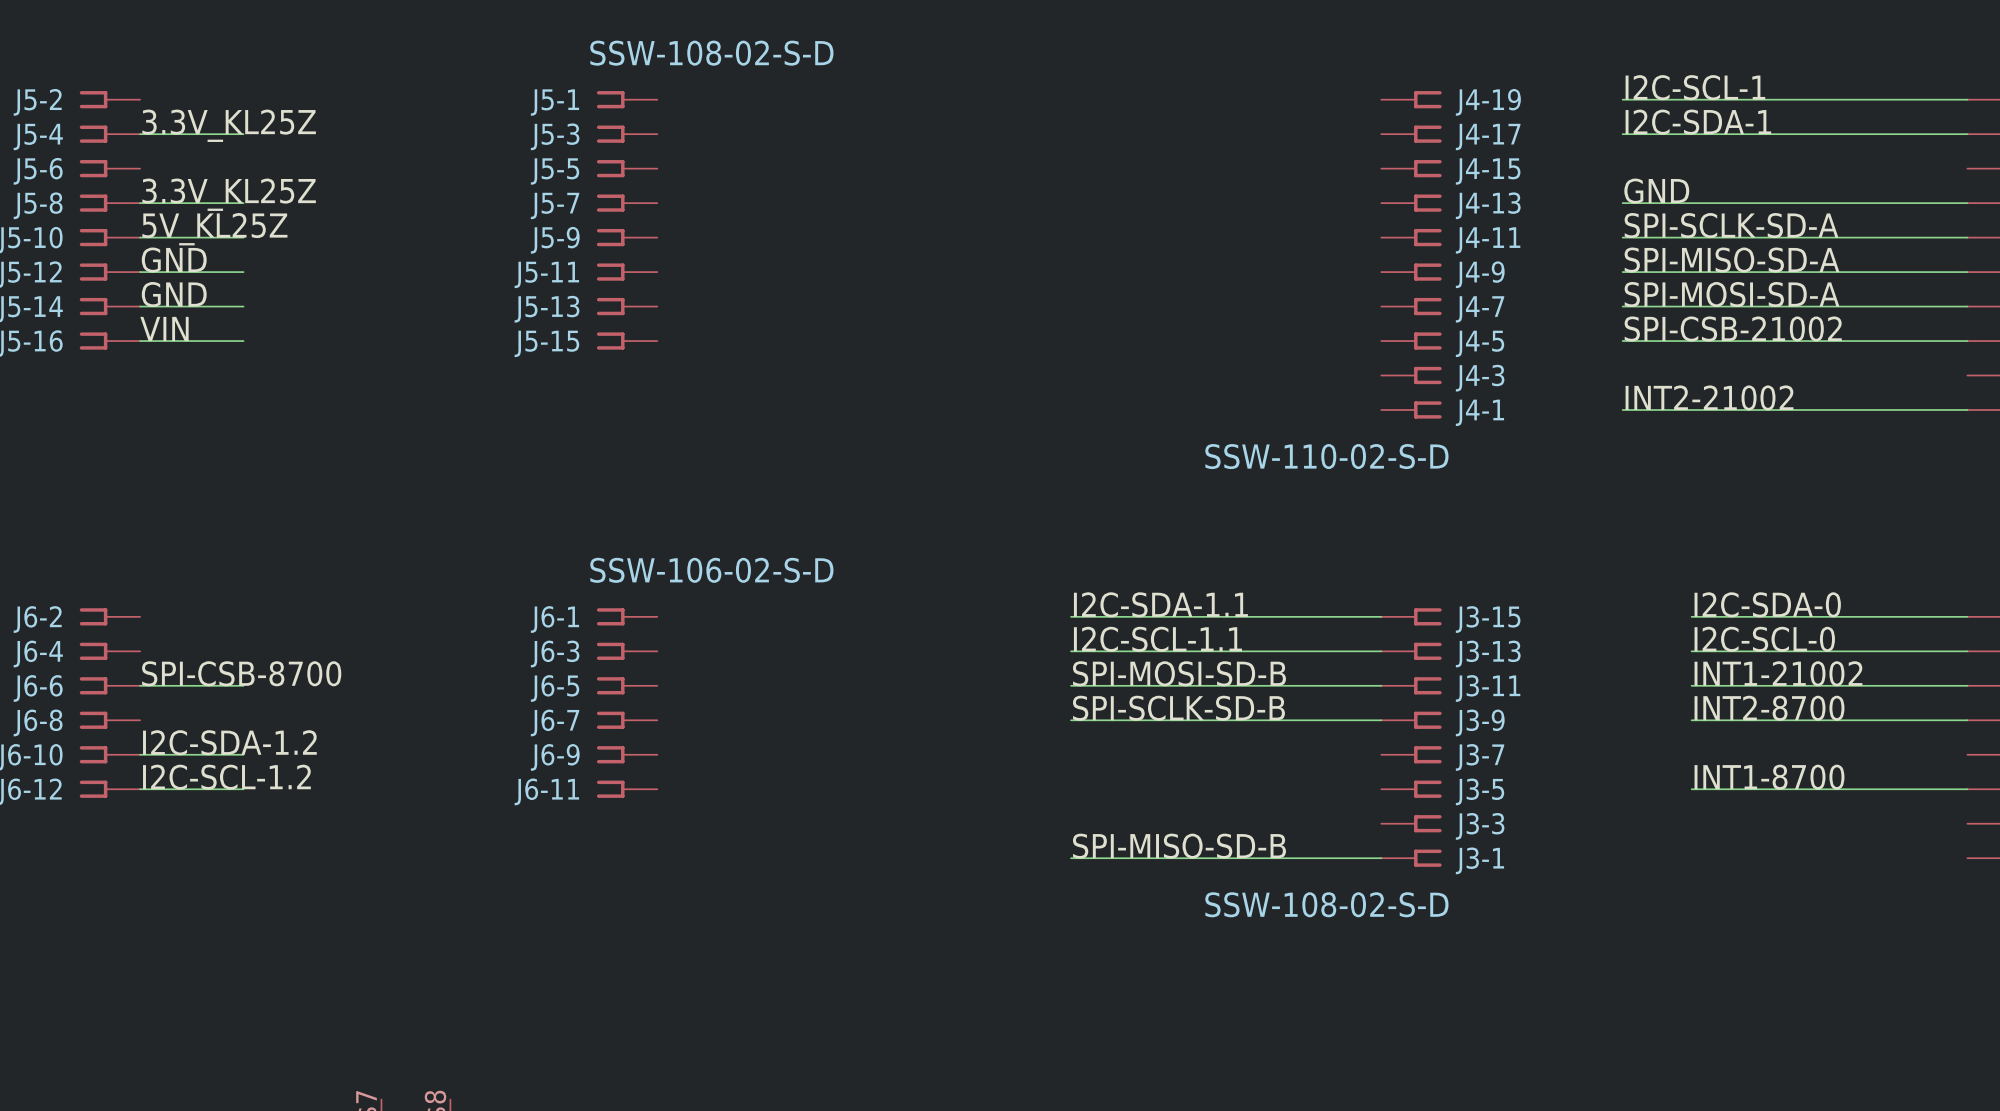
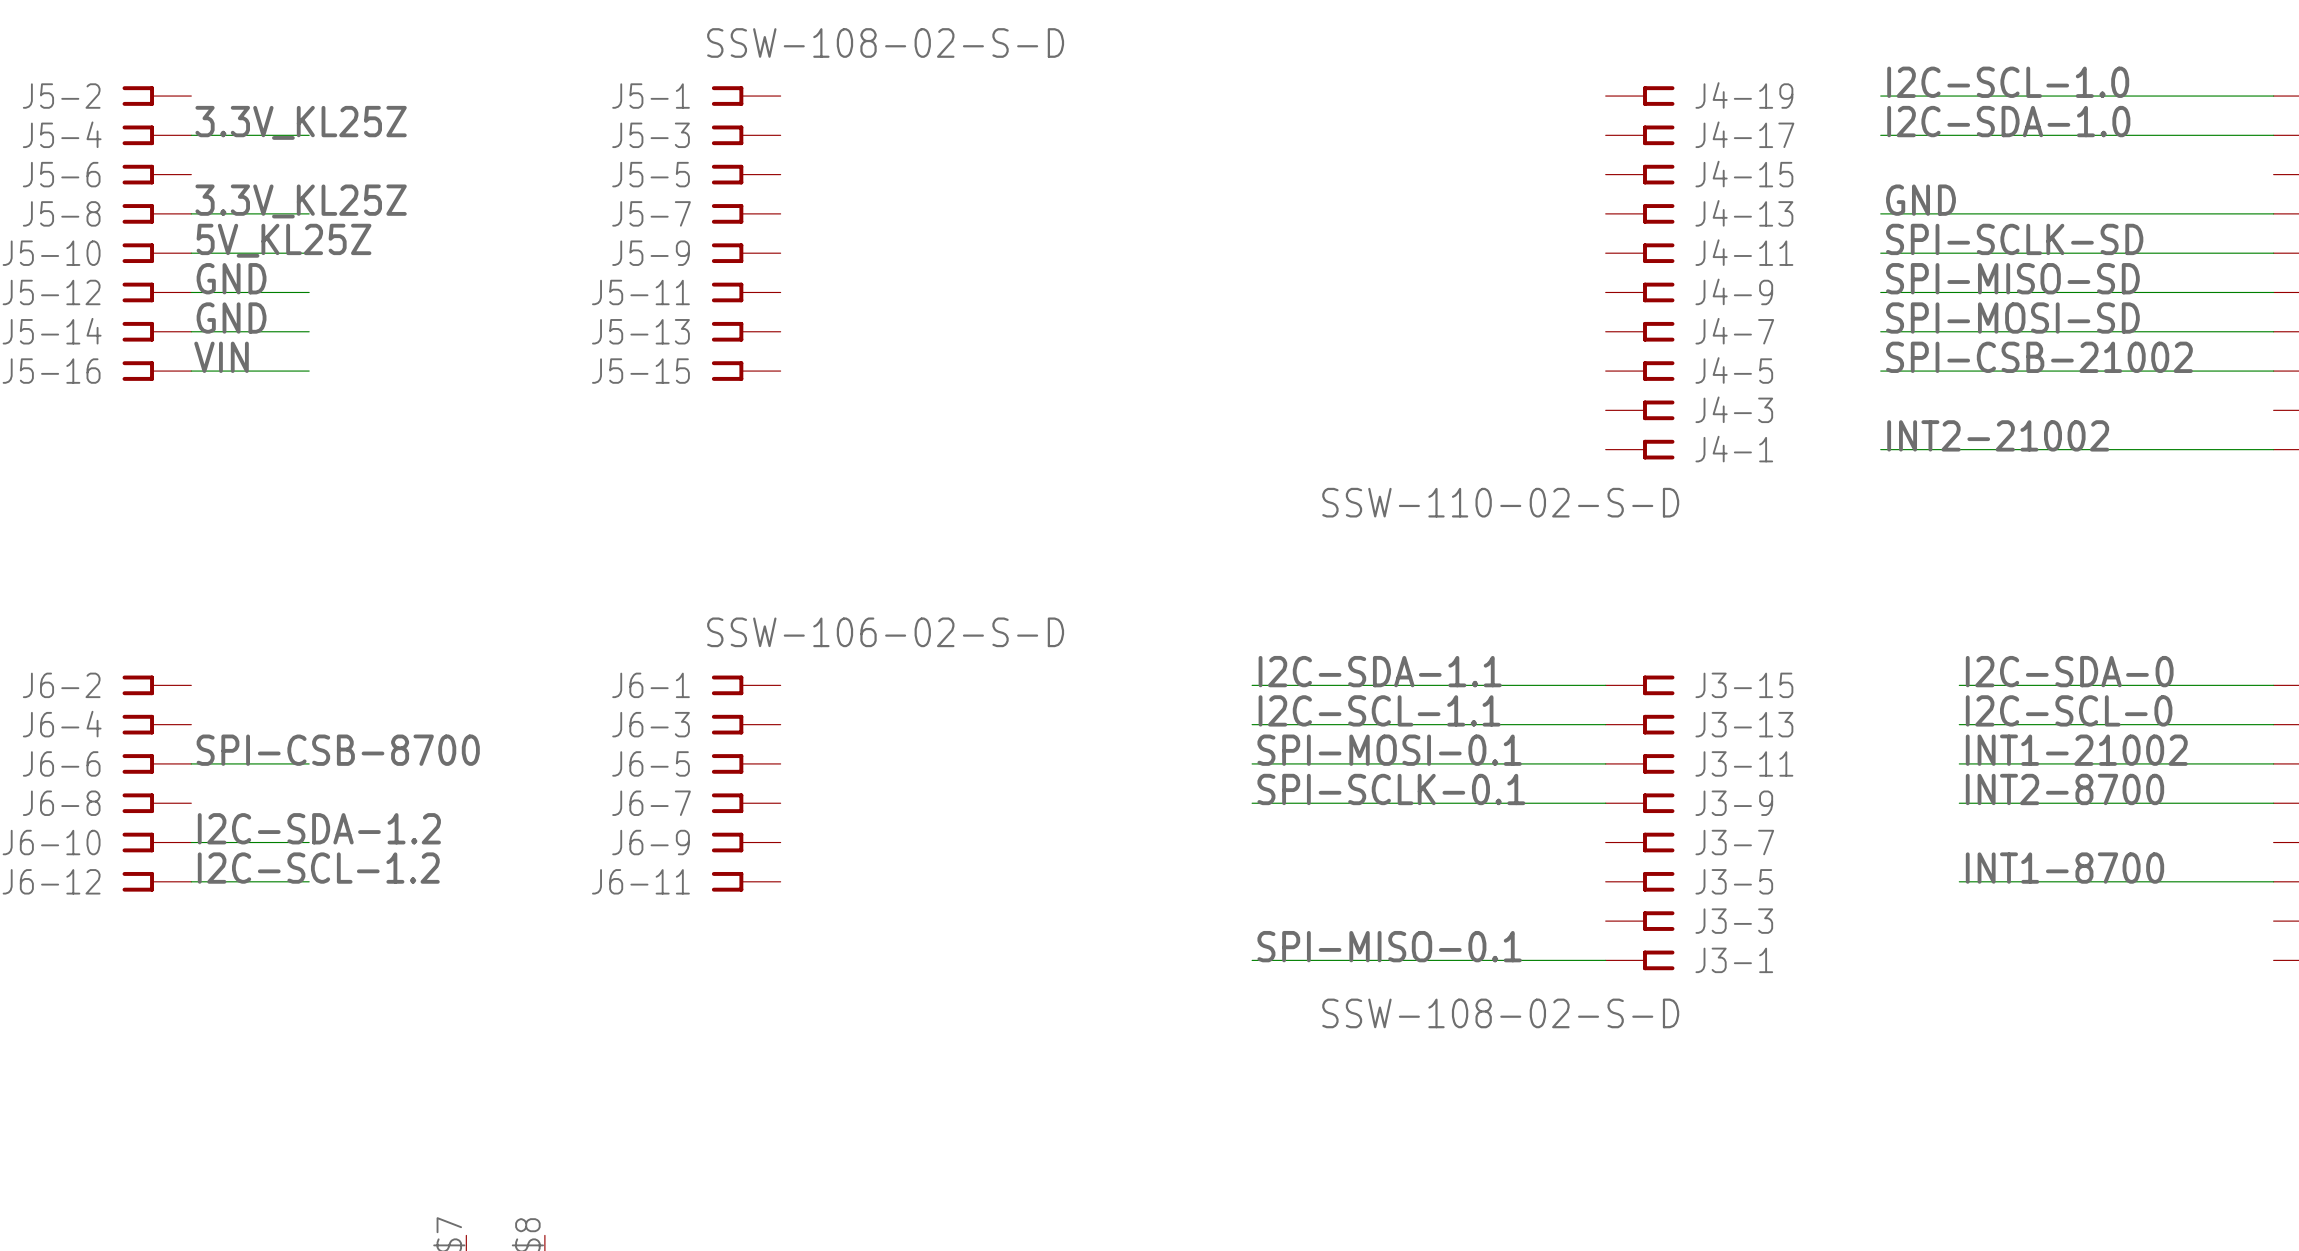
label: I2C-SCL-1 (1695, 87) -> I2C-SCL-1.0 (2008, 82)
label: I2C-SDA-1 (1698, 122) -> I2C-SDA-1.0 (2008, 121)
label: SPI-SCLK-SD-A (1731, 225) -> SPI-SCLK-SD (2014, 239)
label: SPI-MISO-SD-A (1732, 260) -> SPI-MISO-SD (2012, 278)
label: SPI-MOSI-SD-A (1732, 294) -> SPI-MOSI-SD (2012, 318)
label: SPI-MOSI-SD-B (1179, 673) -> SPI-MOSI-0.1 (1389, 750)
label: SPI-SCLK-SD-B (1178, 708) -> SPI-SCLK-0.1 (1391, 789)
label: SPI-MISO-SD-B (1179, 846) -> SPI-MISO-0.1 (1389, 946)

